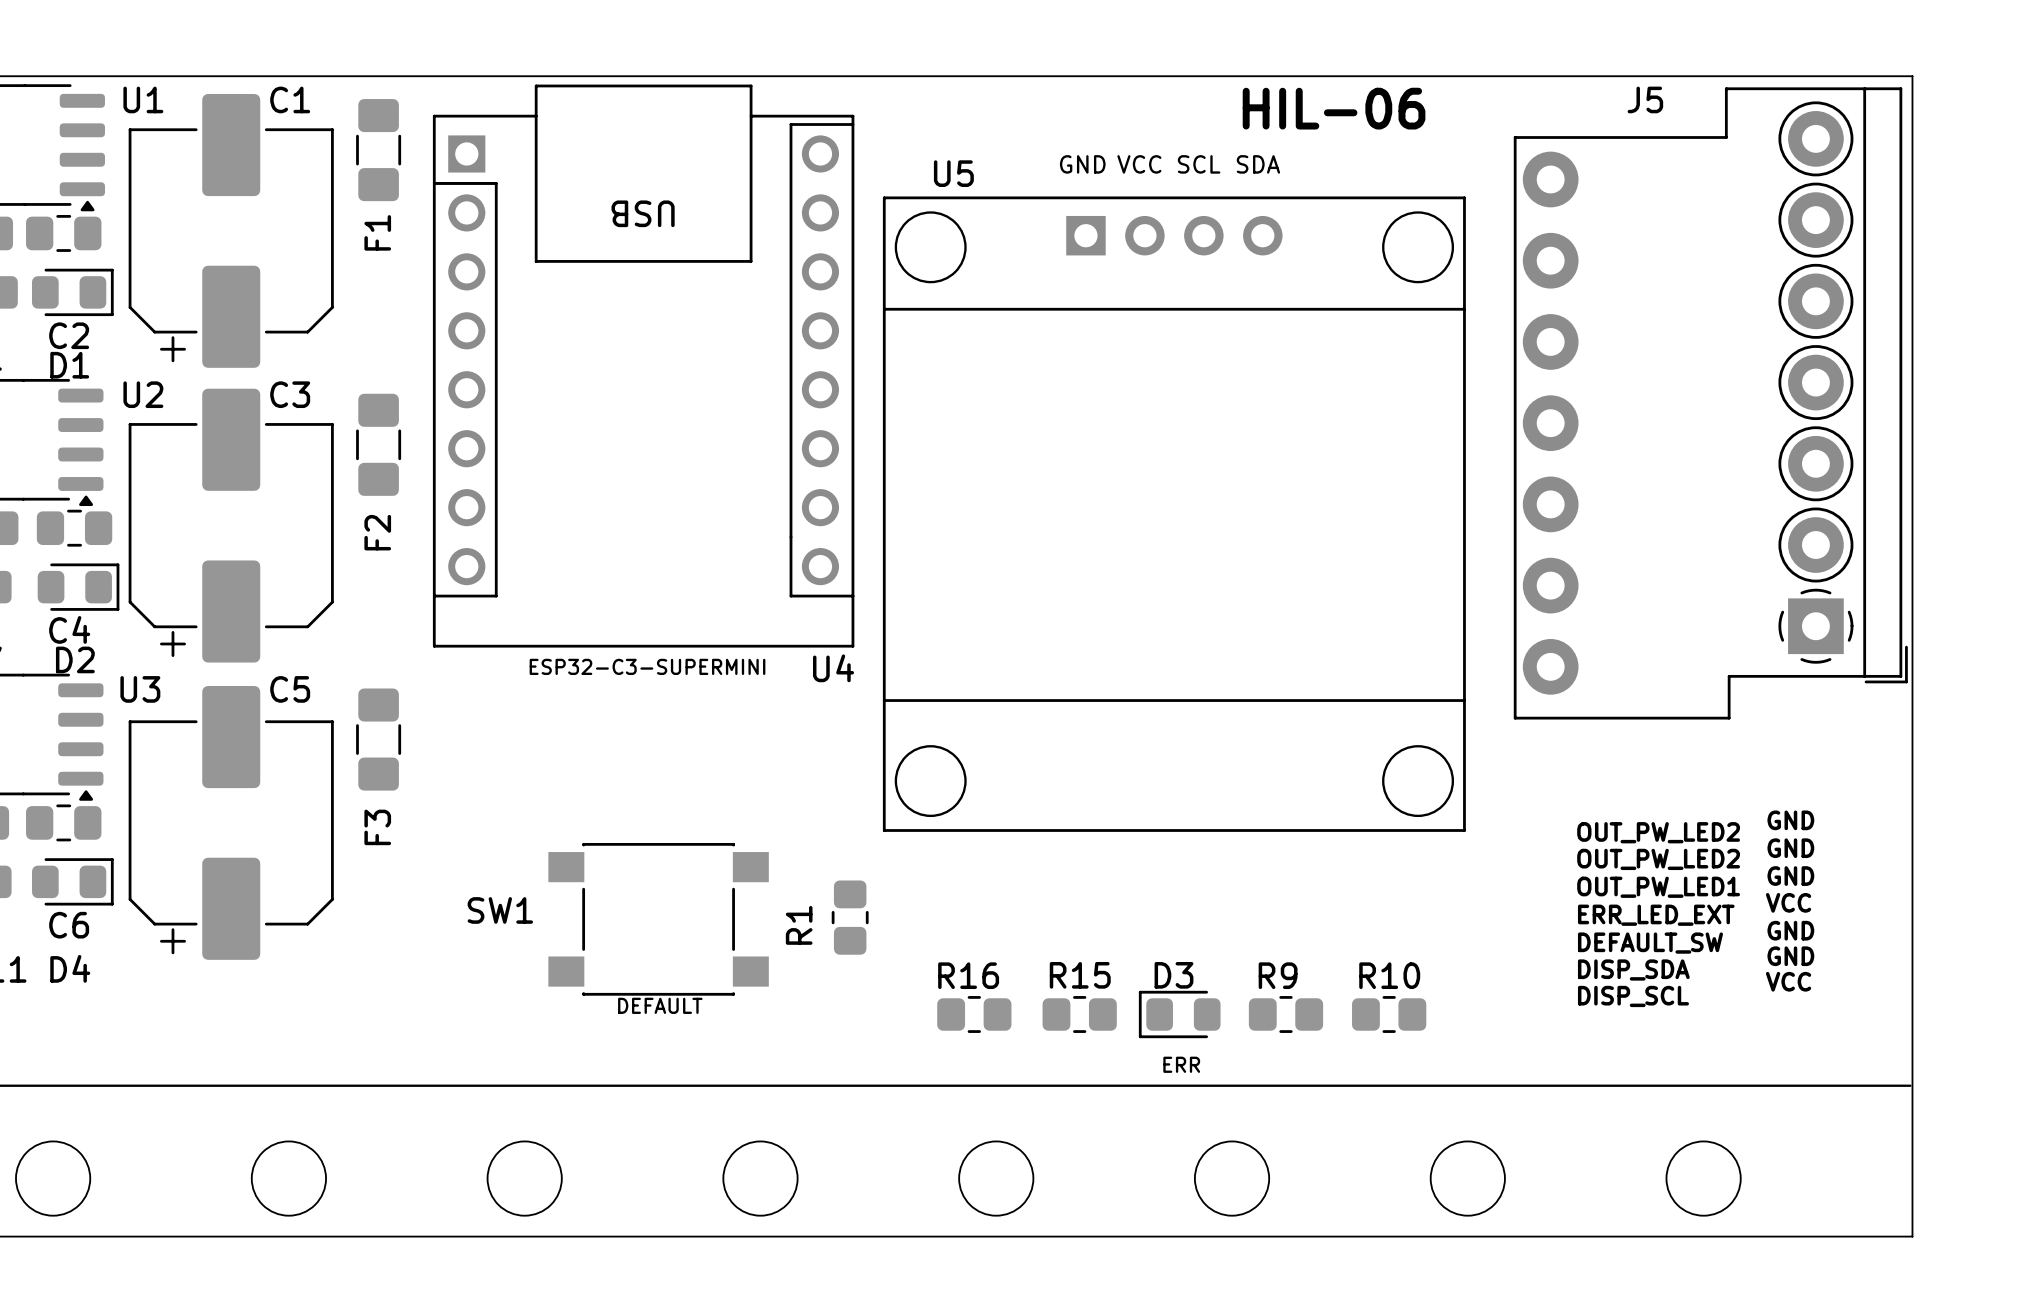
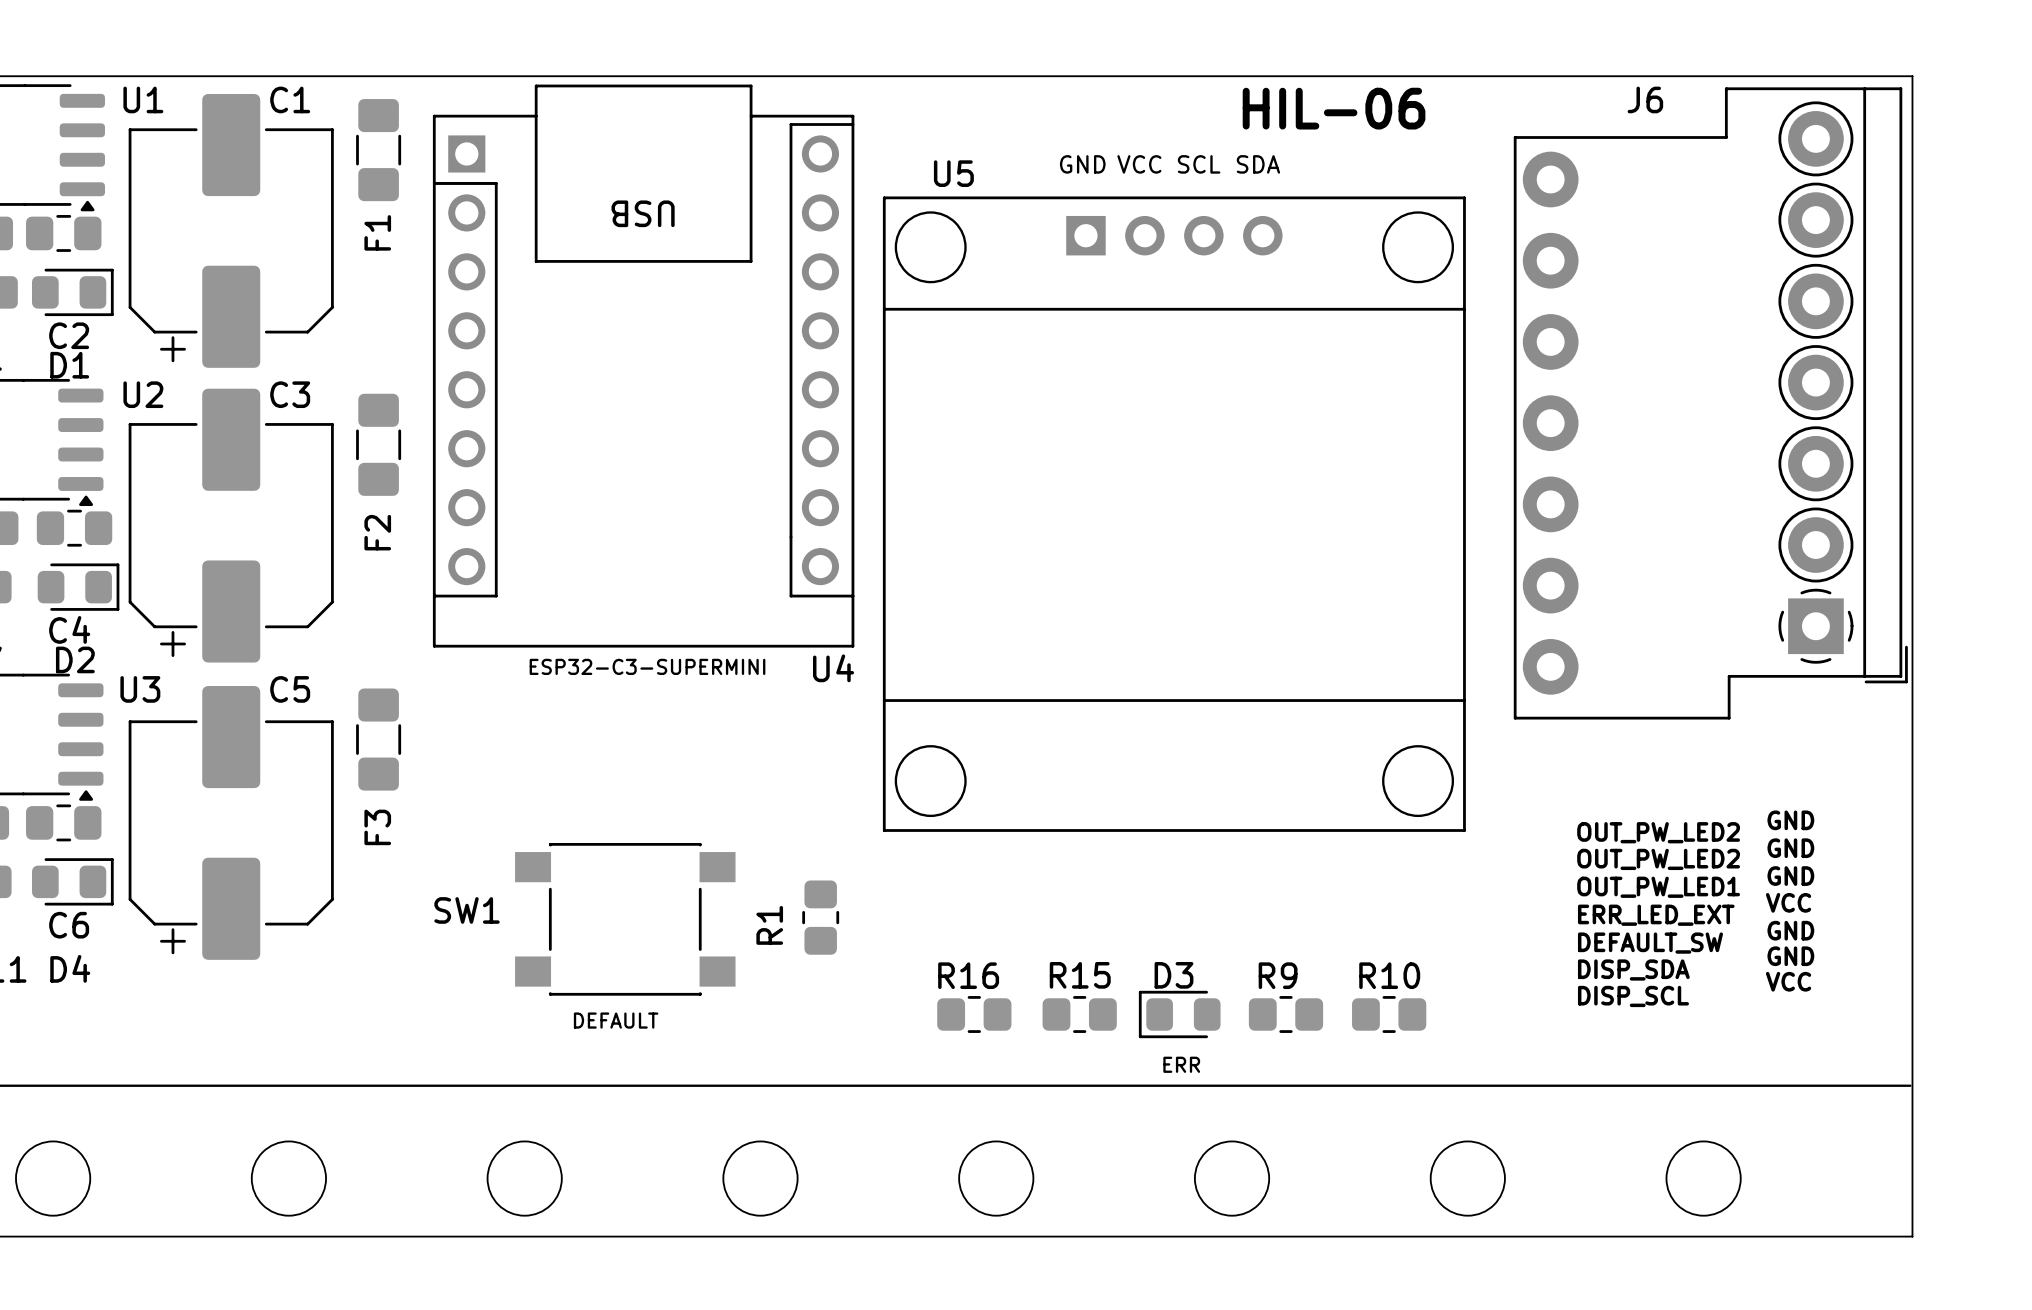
J5 name: J5 (1645, 99) -> J6 (1645, 99)
R1 position: (850, 917) -> (820, 917)
SW1 position: (658, 919) -> (625, 919)
text position: DEFAULT (660, 1005) -> DEFAULT (616, 1020)

